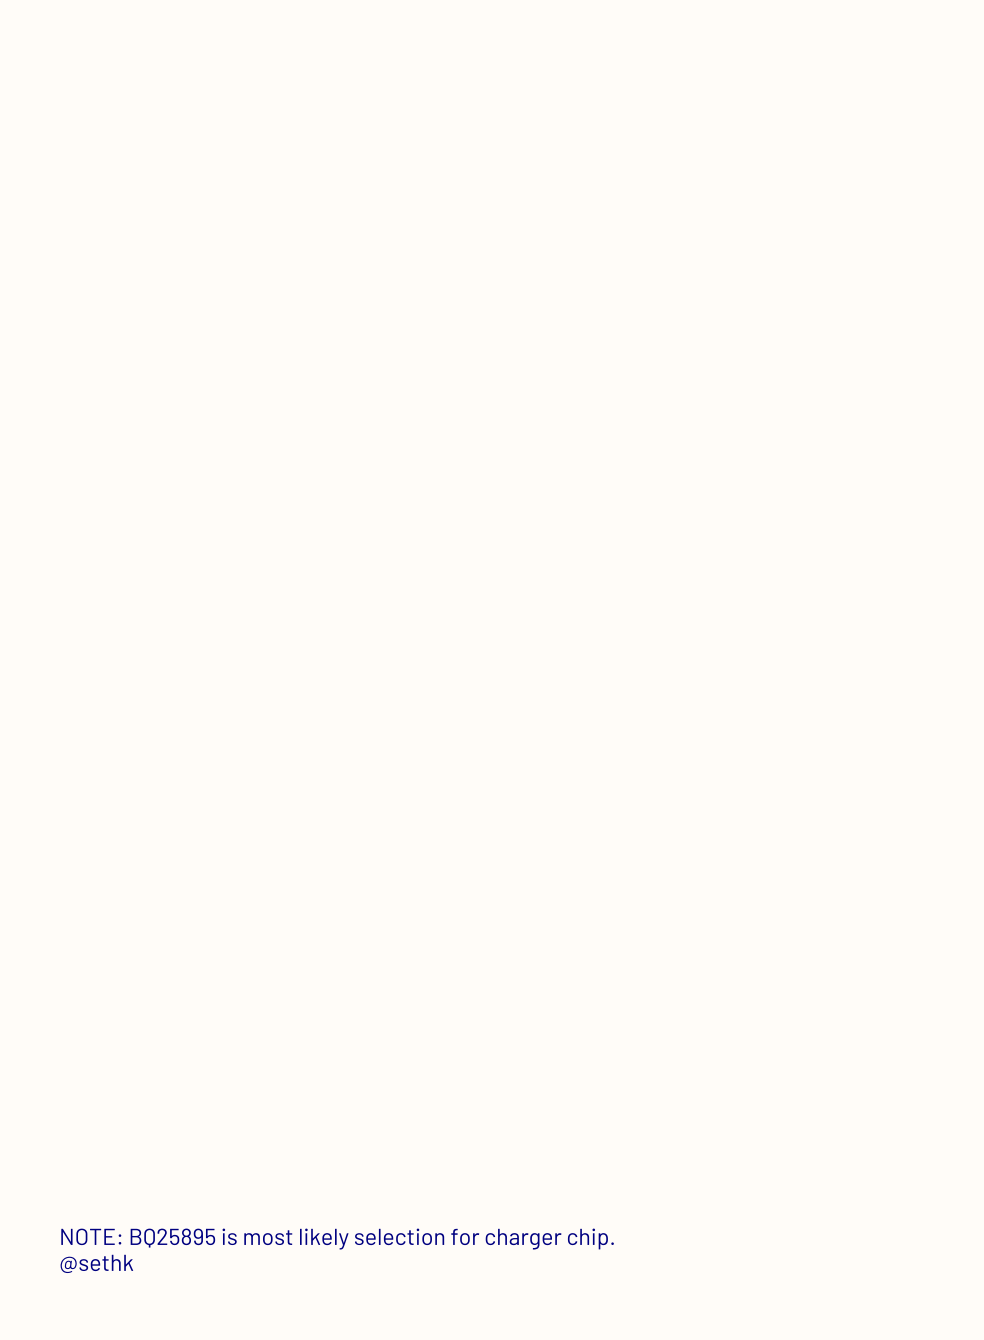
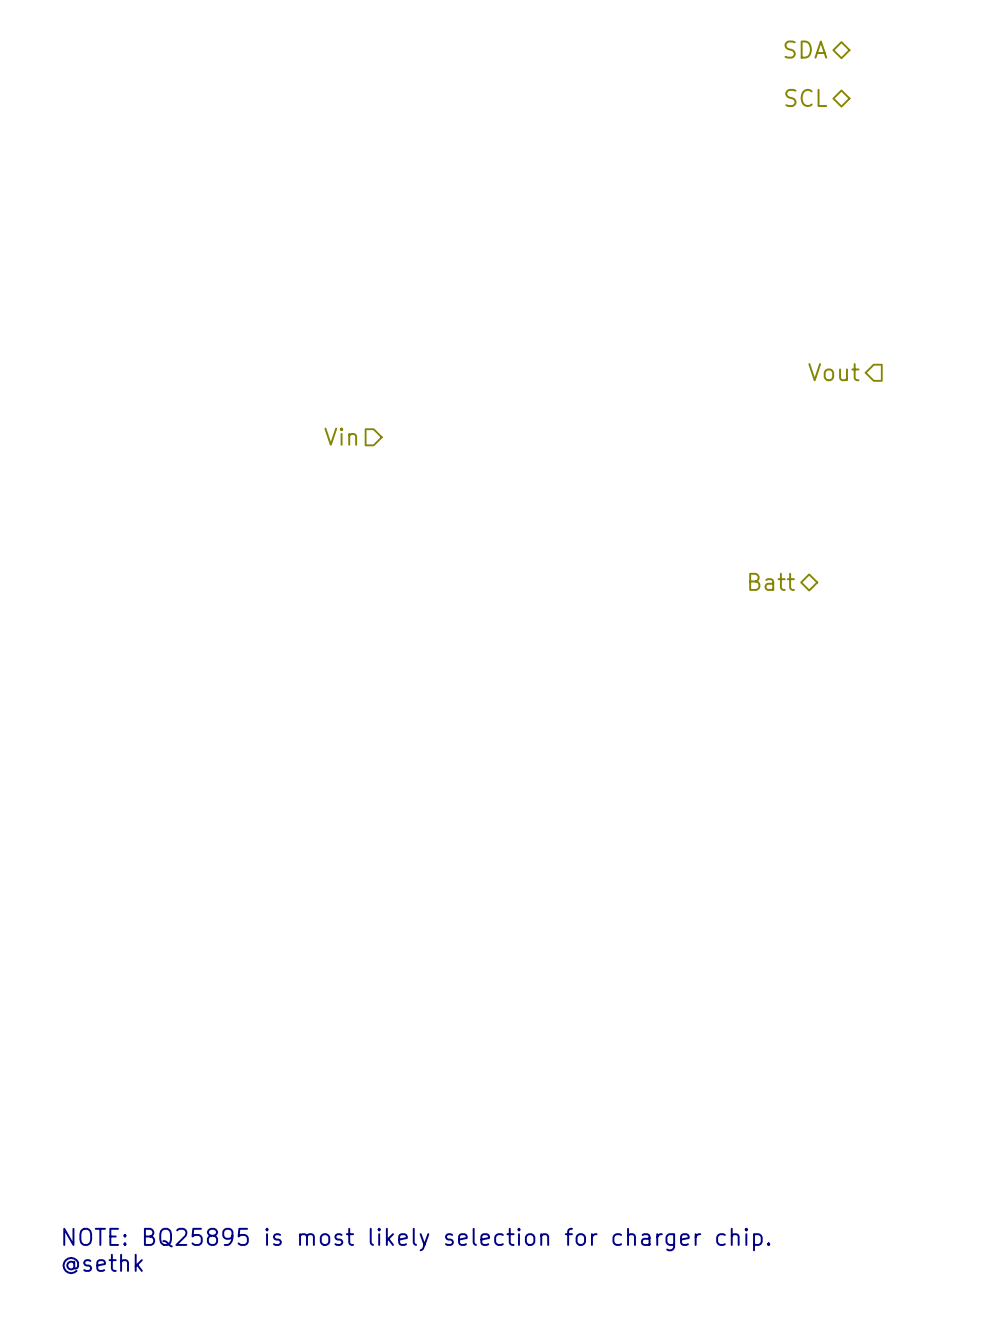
hierarchical label: none -> SDA (805, 49)
hierarchical label: none -> SCL (806, 97)
hierarchical label: none -> Vout (833, 372)
hierarchical label: none -> Vin (340, 436)
hierarchical label: none -> Batt (772, 581)

